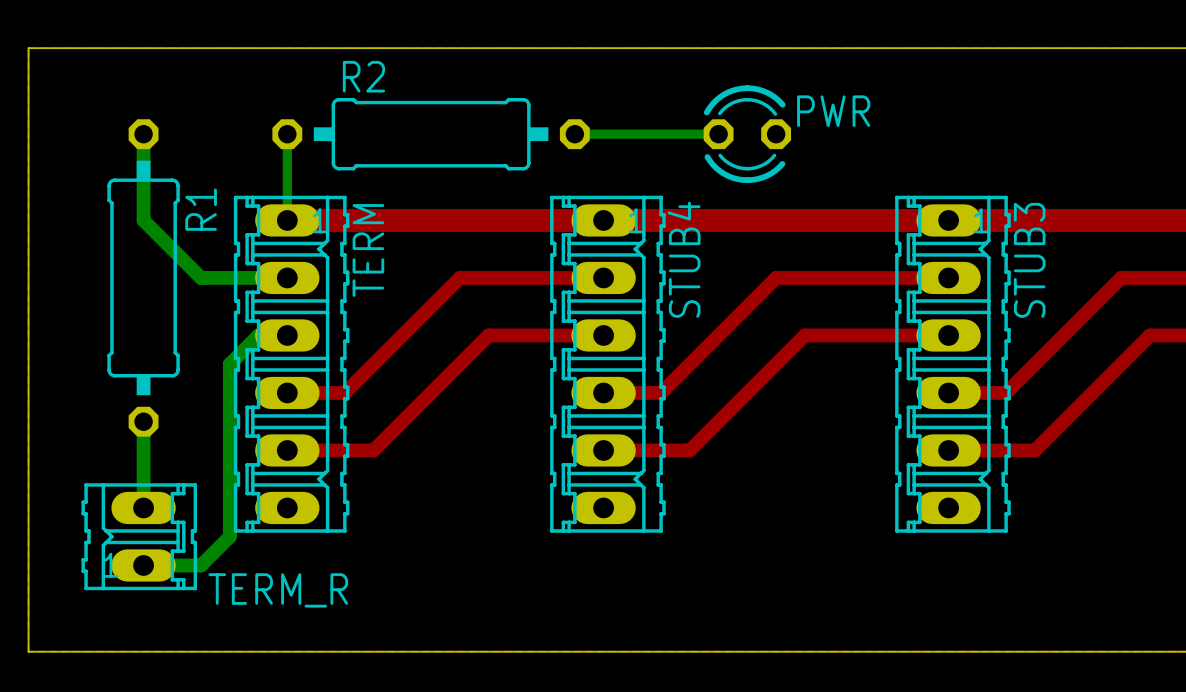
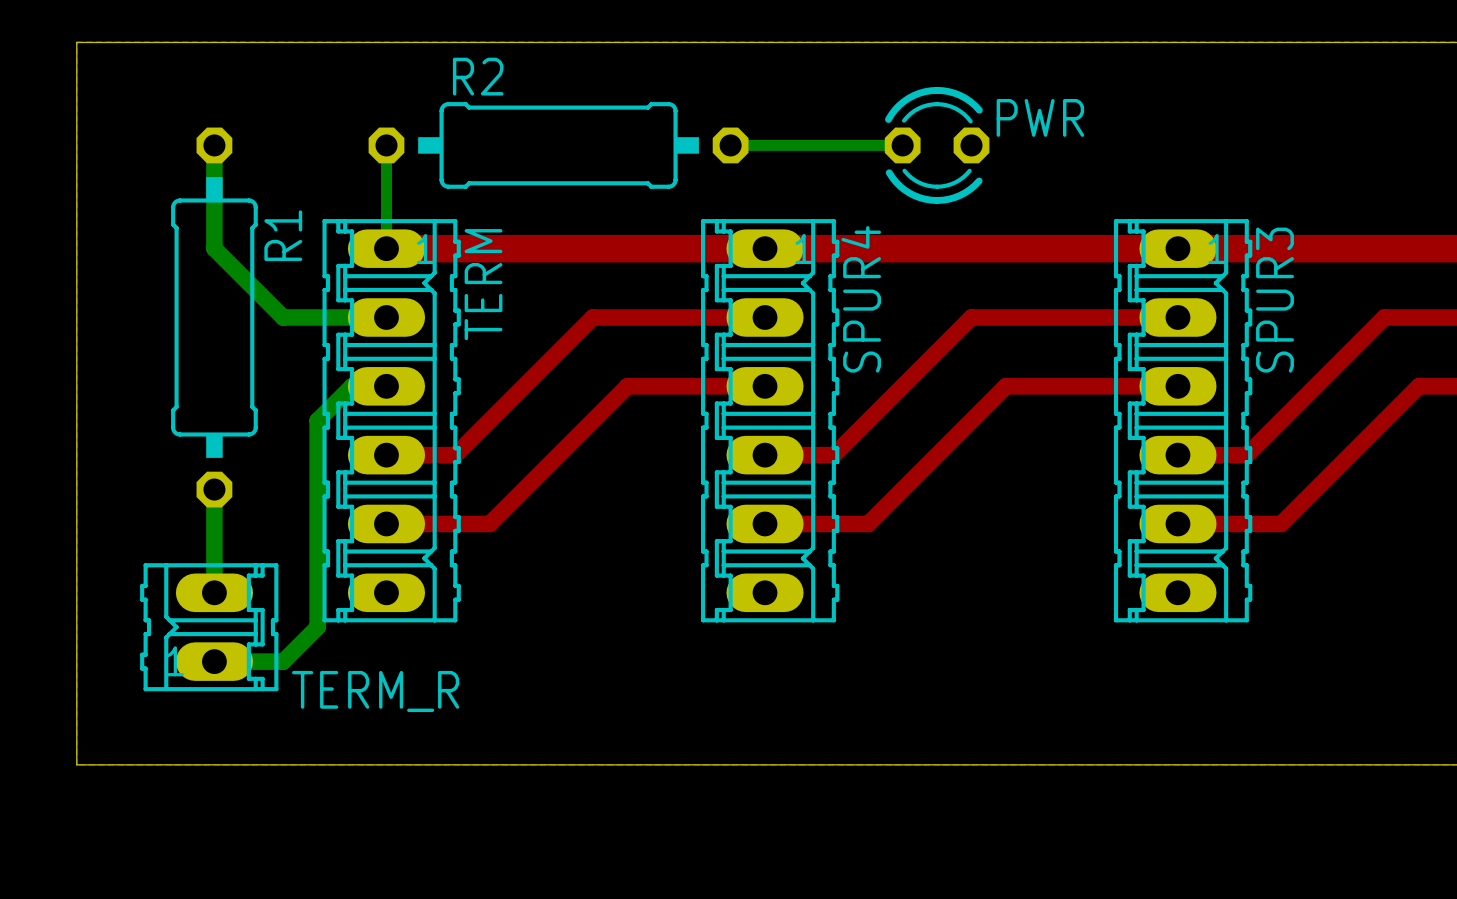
STUB4 name: STUB4 (684, 259) -> SPUR4 (861, 299)
STUB3 name: STUB3 (1029, 260) -> SPUR3 (1275, 300)

